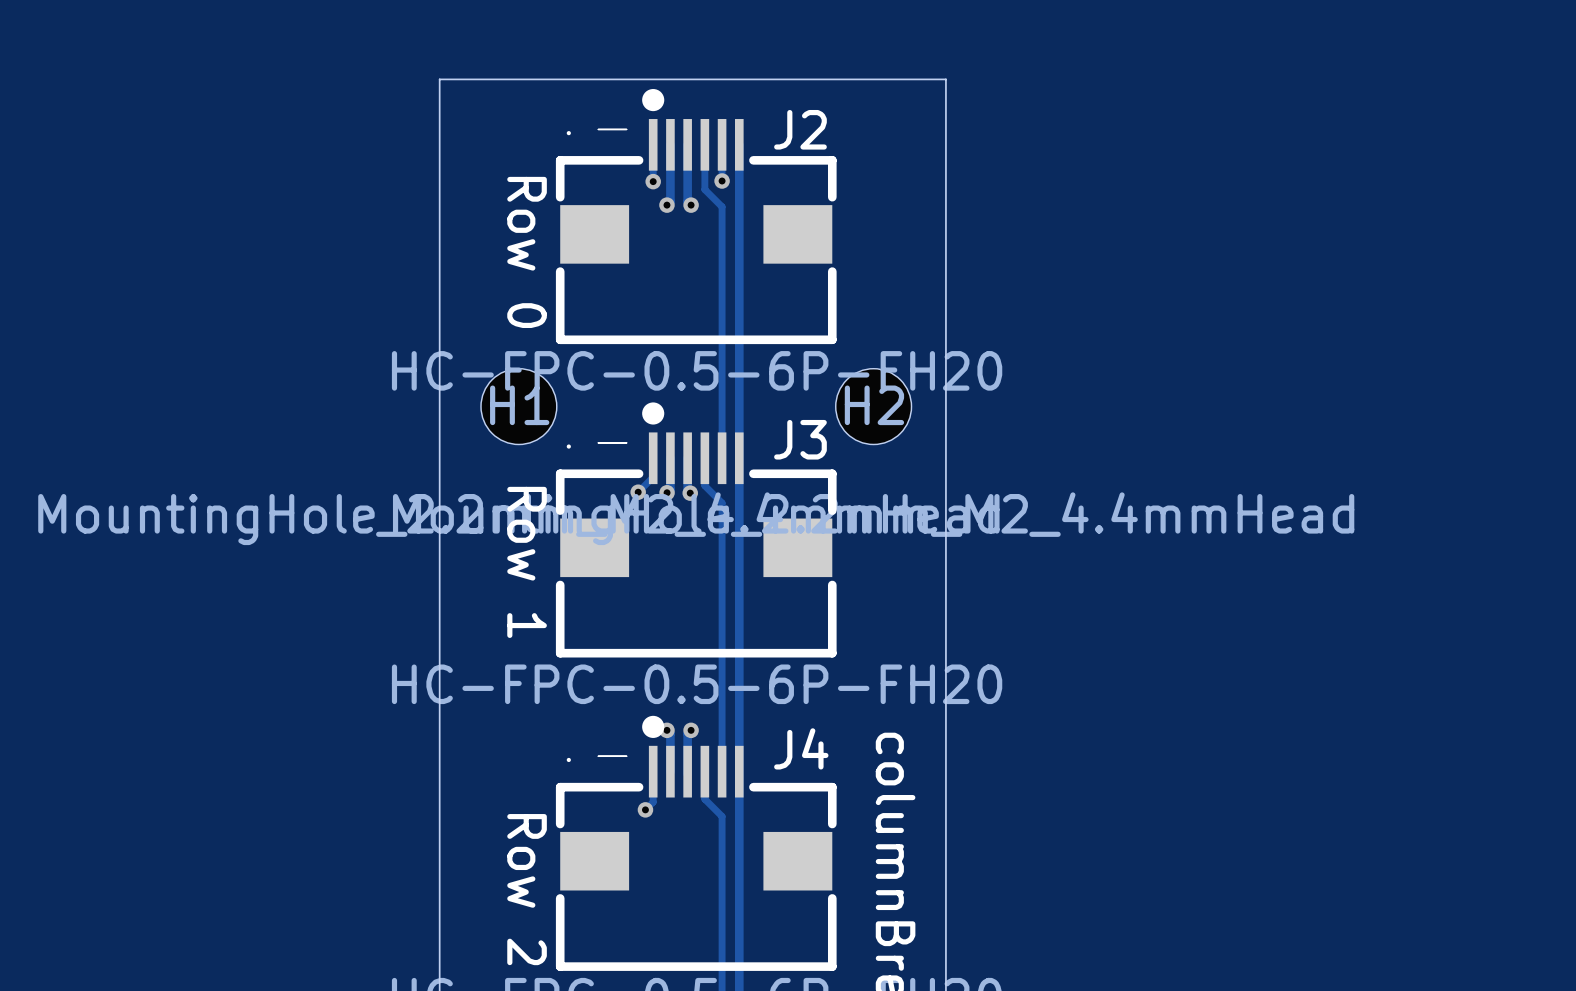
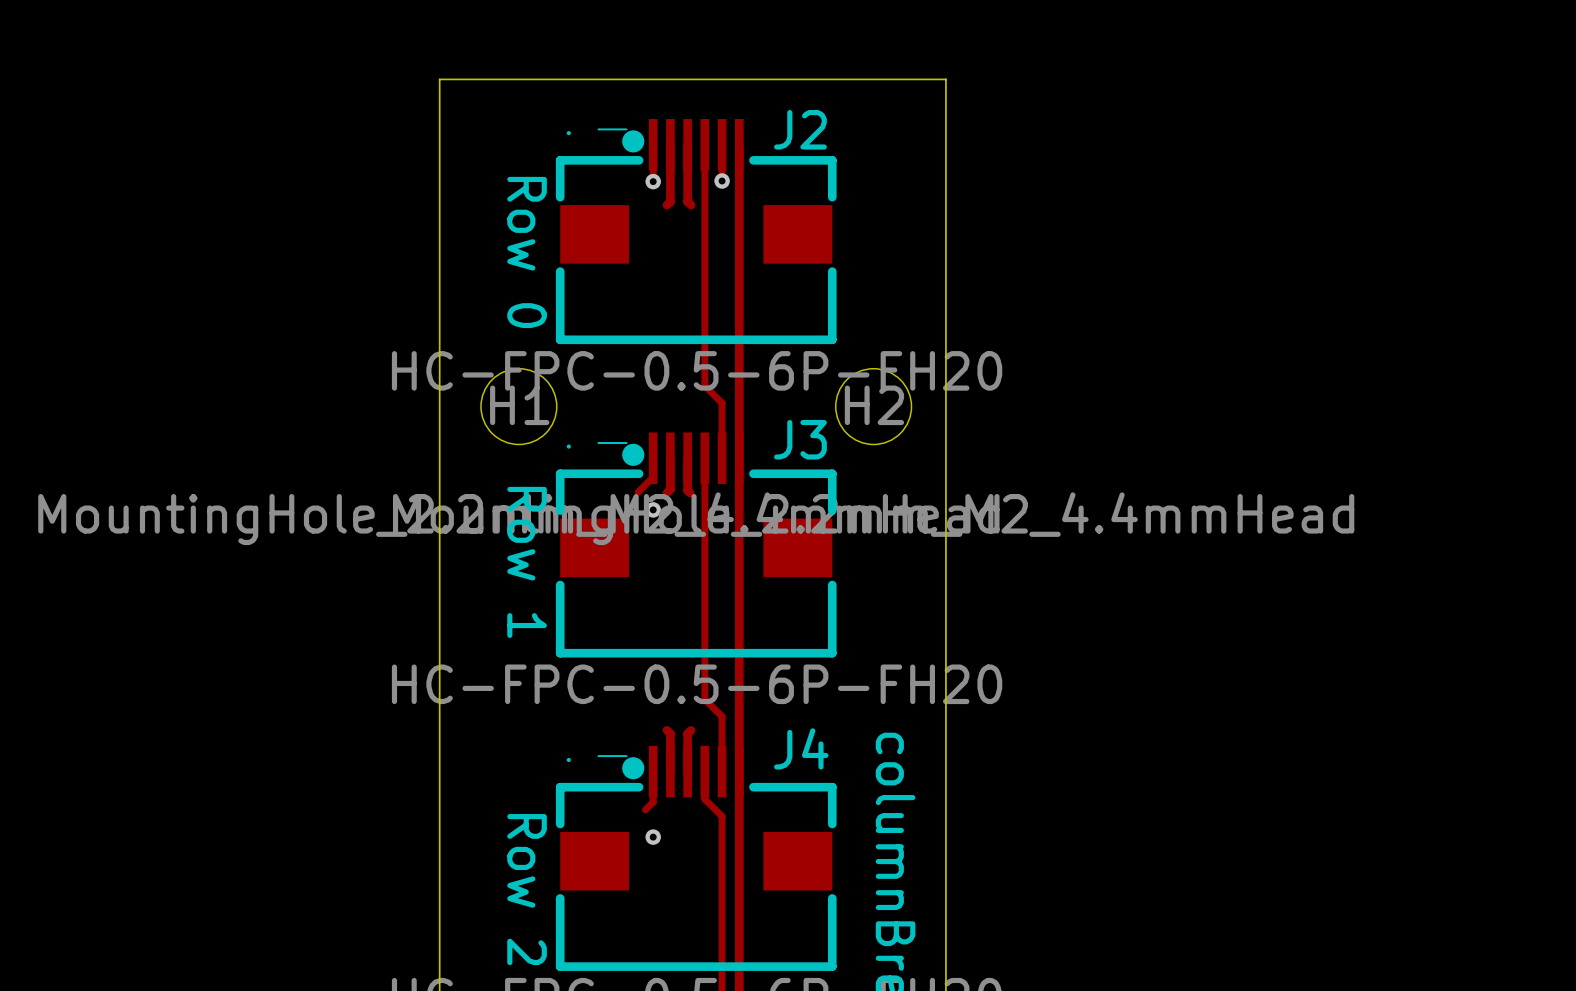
drawing position: (653, 100) -> (633, 141)
track: (704, 189) (722, 206) (722, 403) -> (704, 189) (704, 385) (722, 403)
via: (666, 205) -> none
via: (691, 205) -> none
drawing position: (653, 413) -> (633, 454)
track: (704, 485) (722, 503) (722, 716) -> (704, 485) (704, 699) (722, 716)
via: (638, 492) -> none
via: (667, 492) -> none
via: (690, 493) -> none
via: none -> (653, 509)
drawing position: (653, 726) -> (633, 768)
via: (666, 730) -> none
via: (691, 730) -> none
via position: (645, 809) -> (653, 837)

